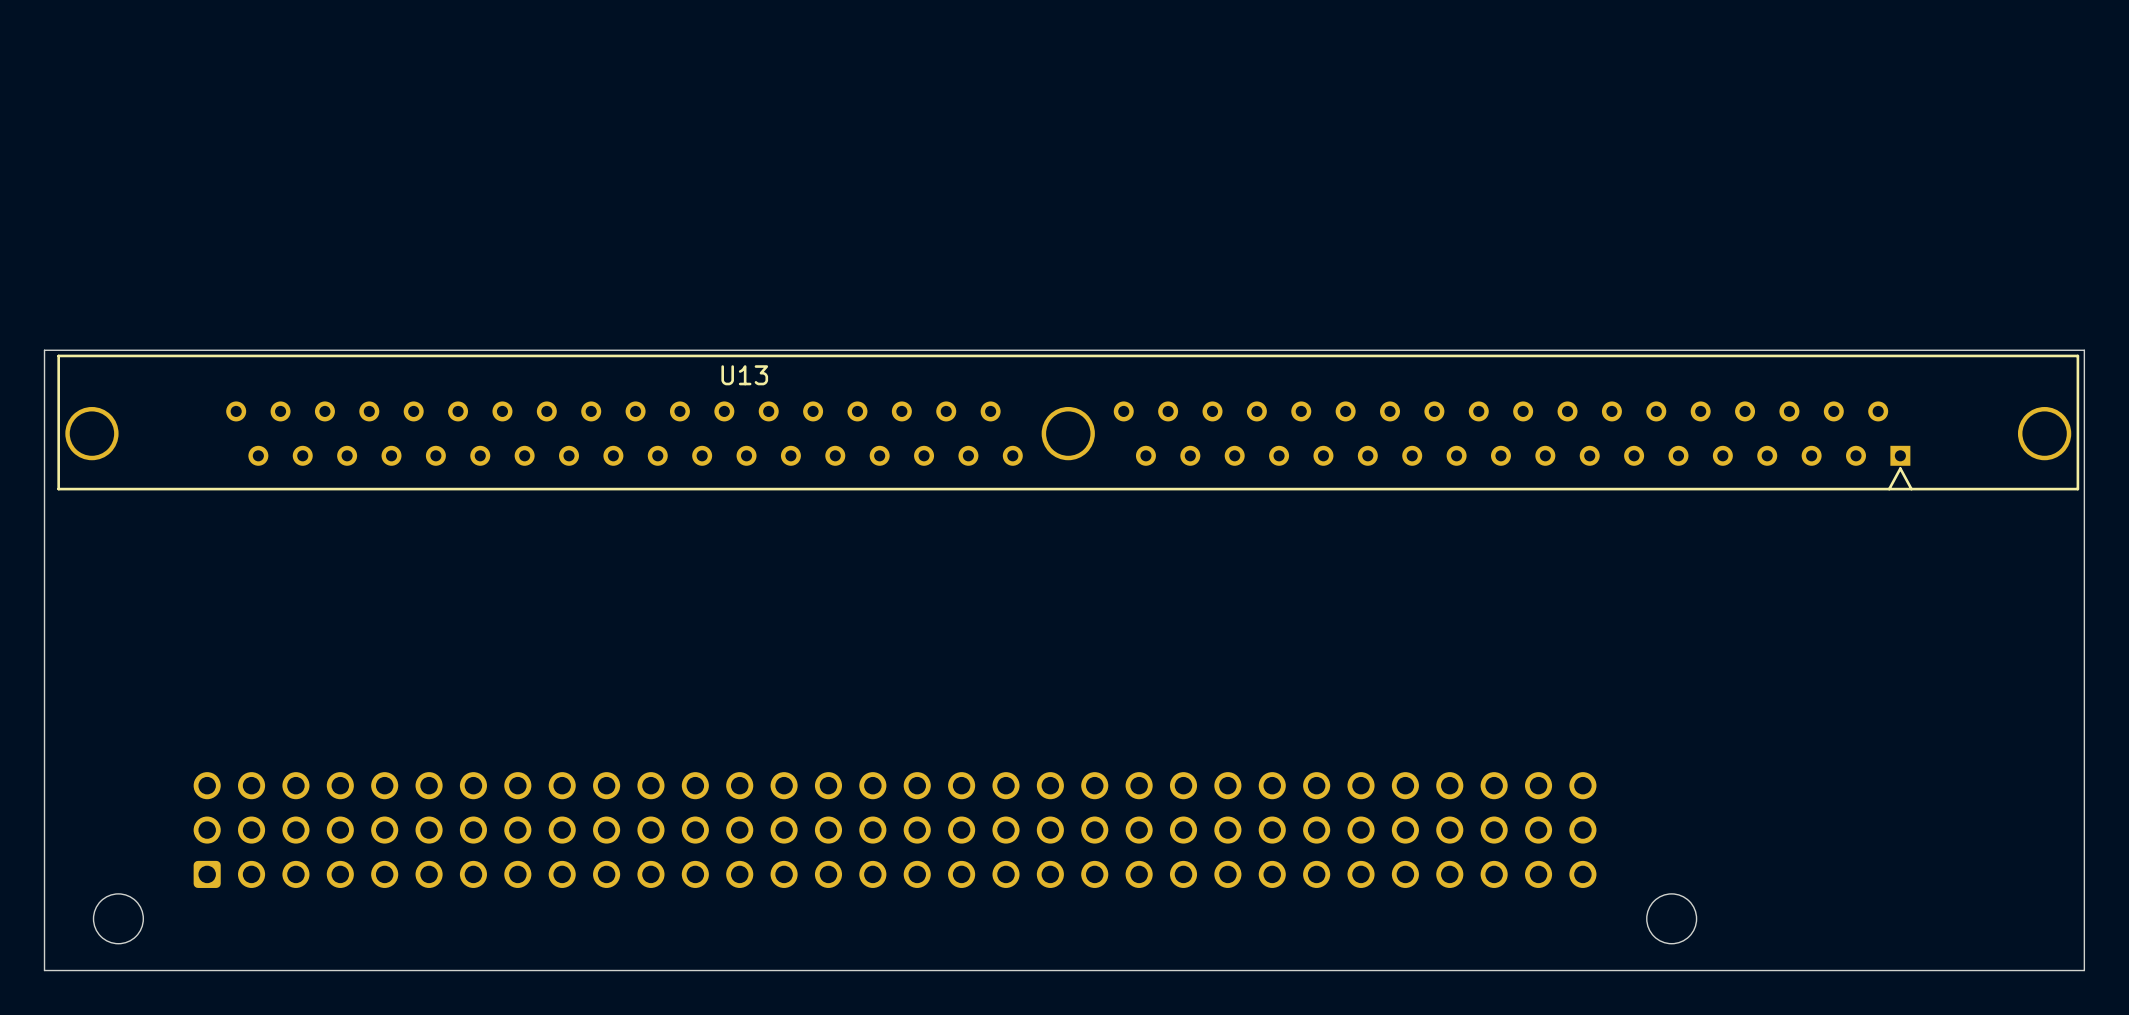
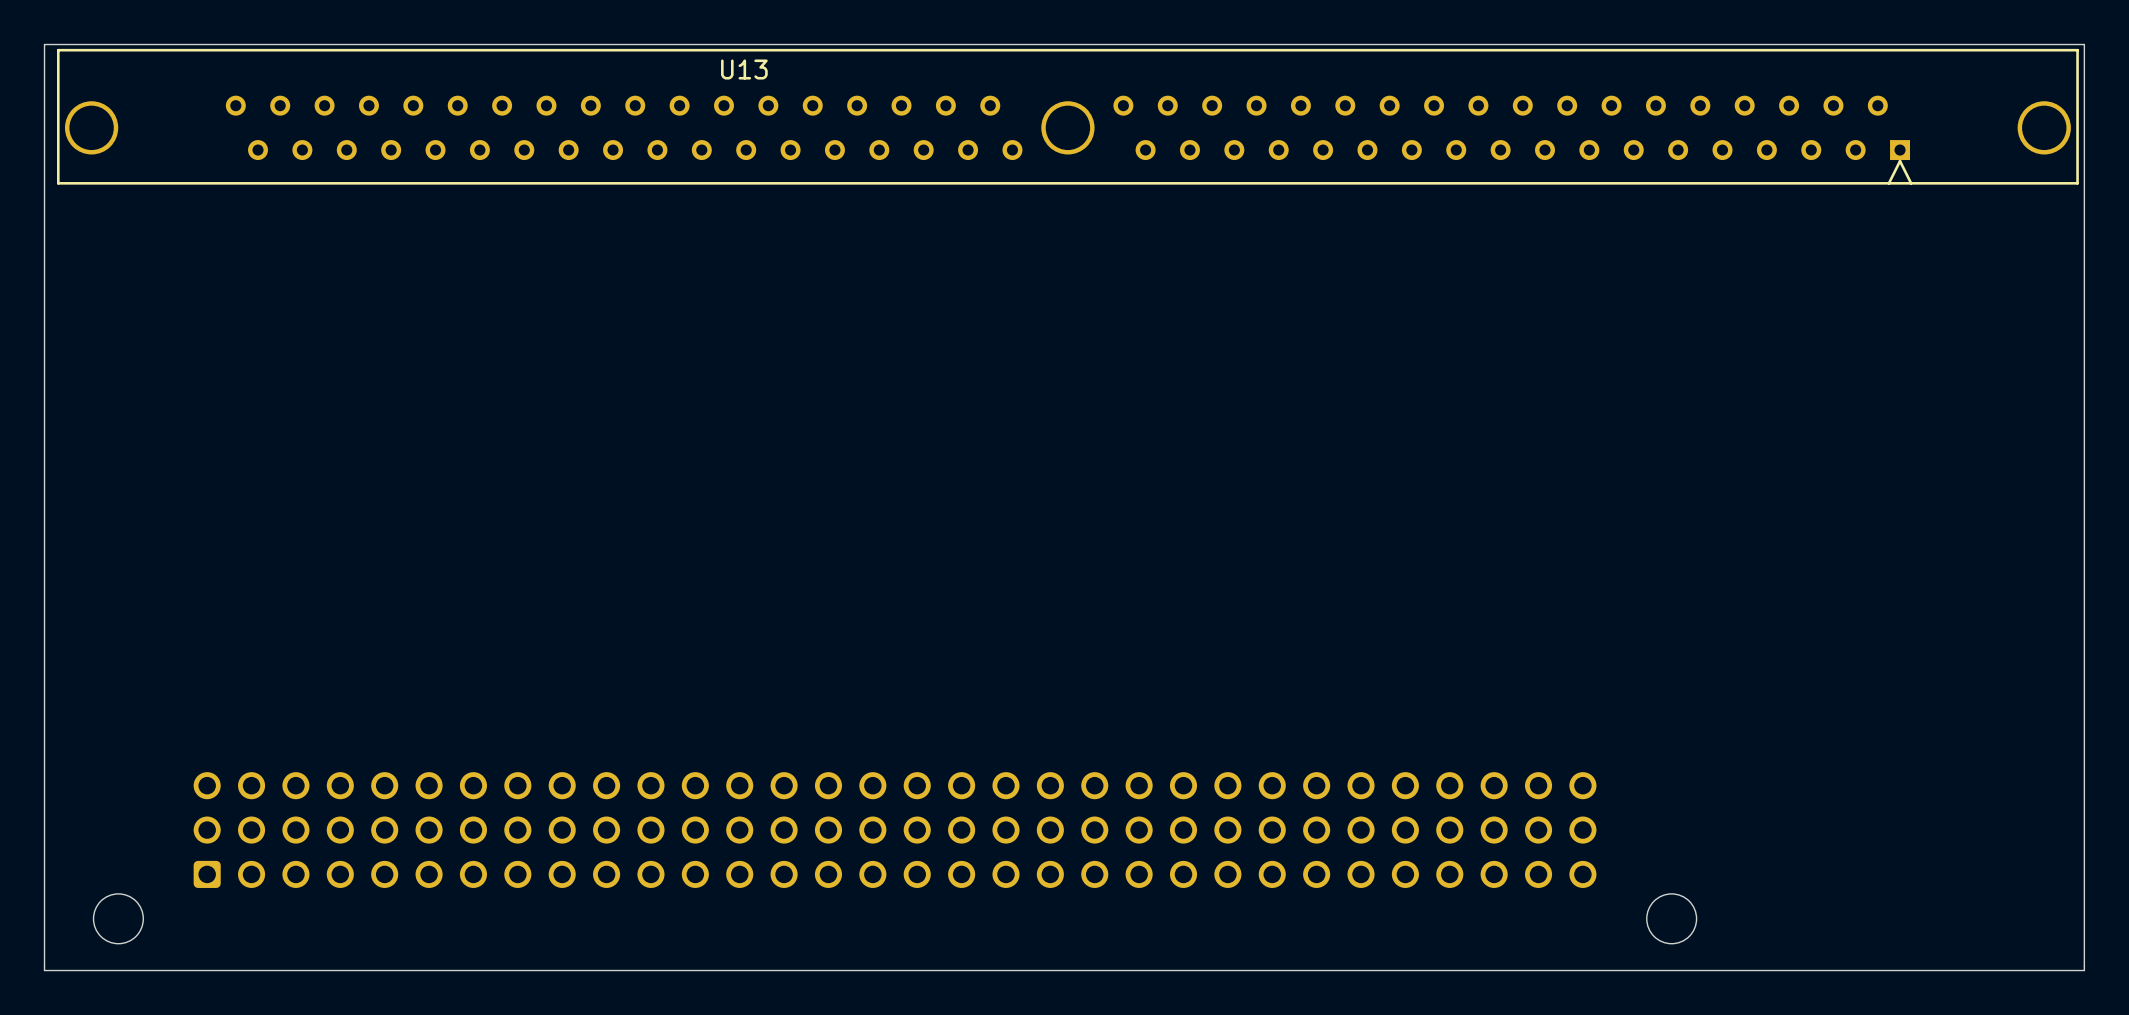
board edge: (2084, 350) (44, 350) -> (2084, 350) (2084, 44) (44, 44) (44, 350)
U13 footprint: [57, 354, 2080, 491] -> [57, 48, 2079, 185]

